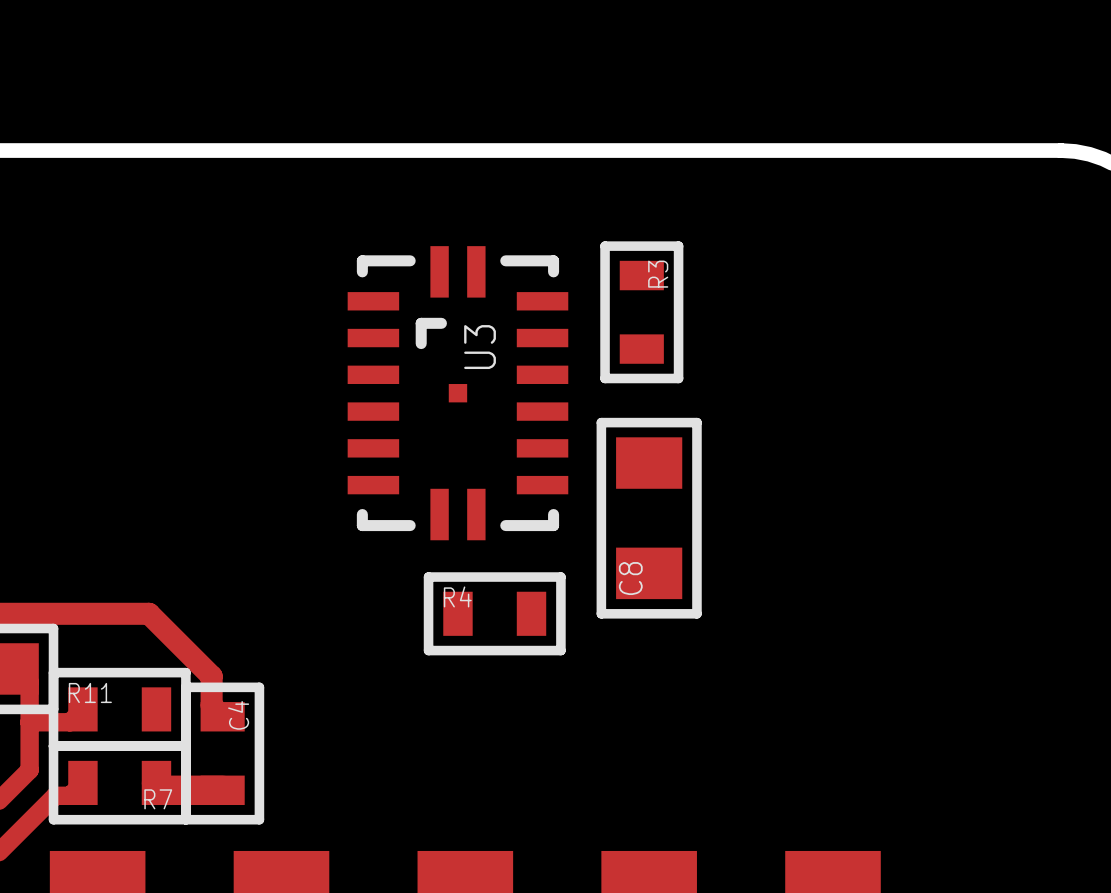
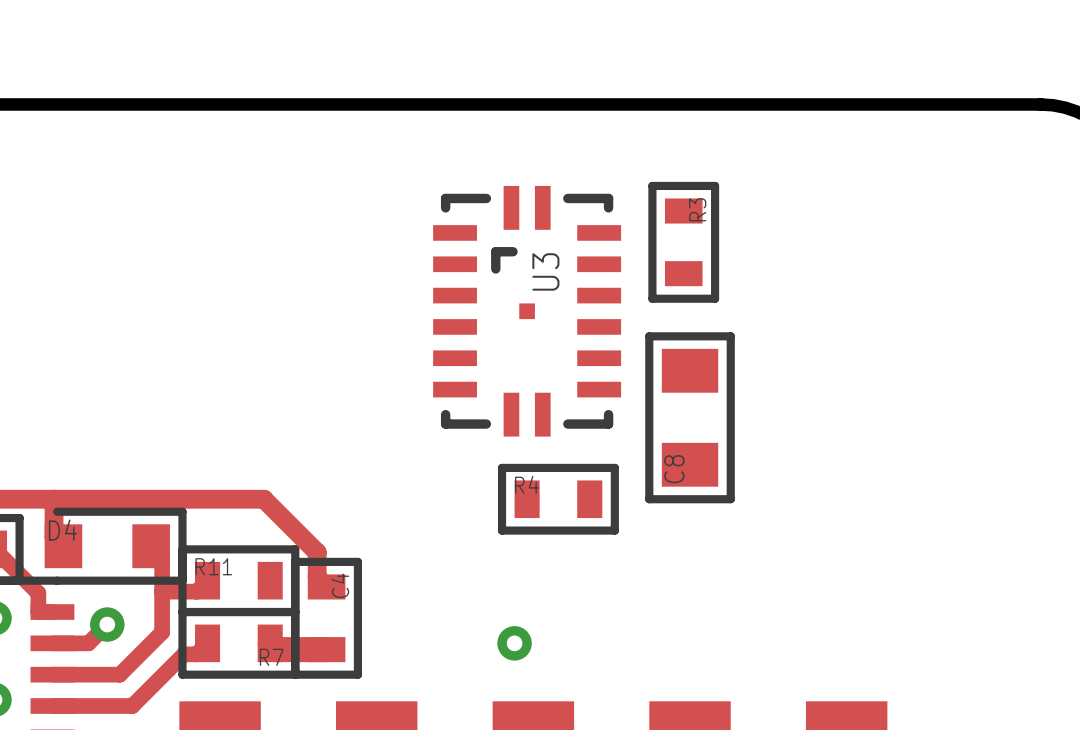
via: none -> (514, 643)

